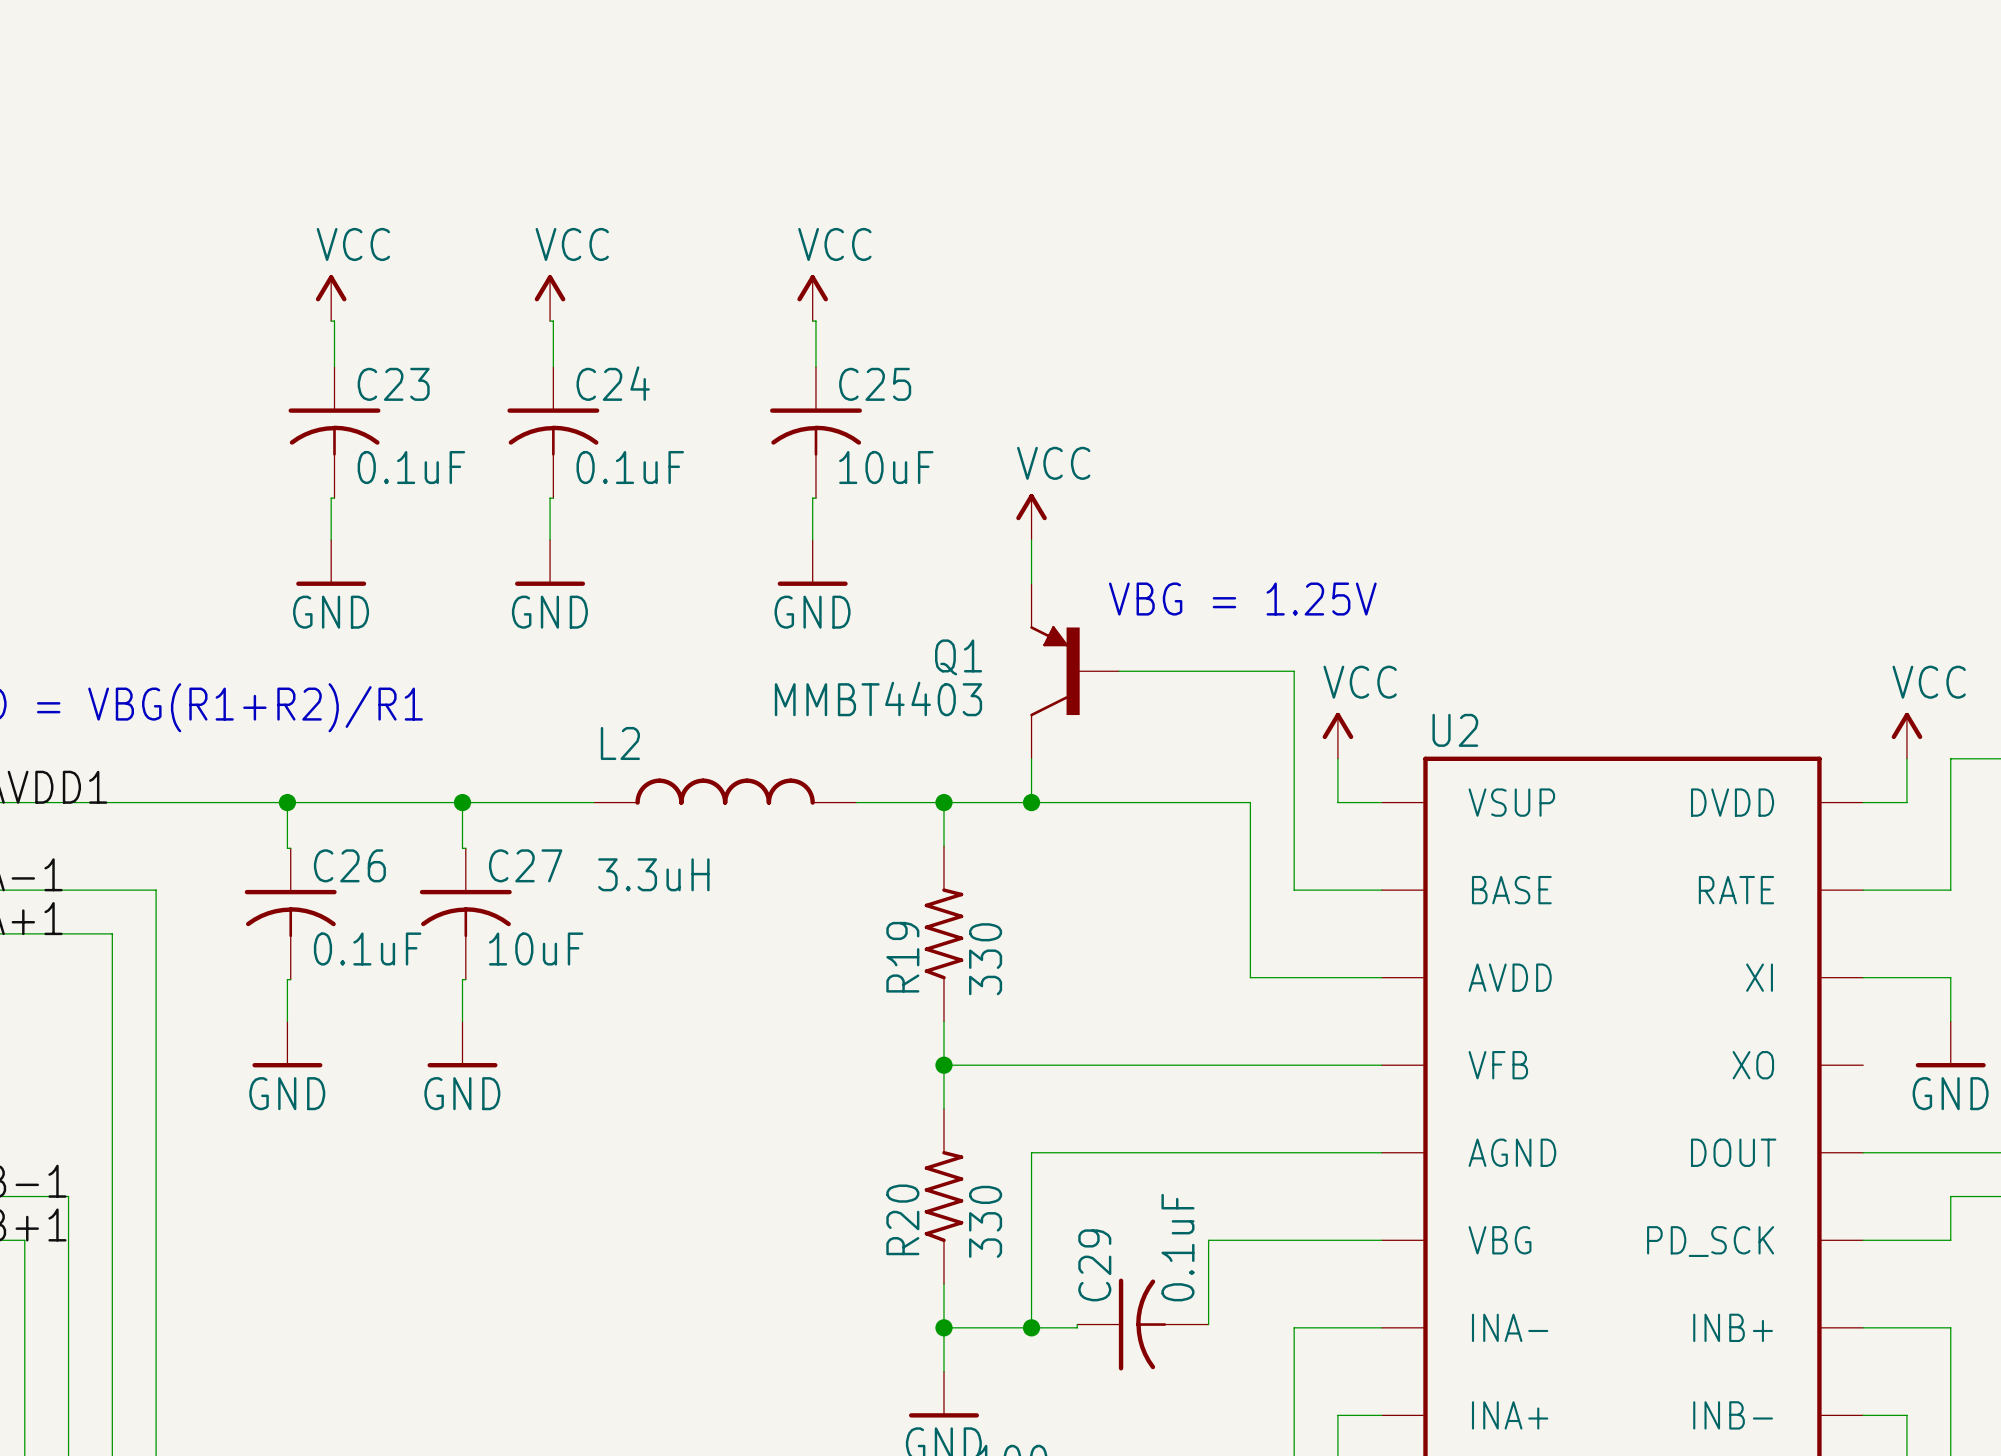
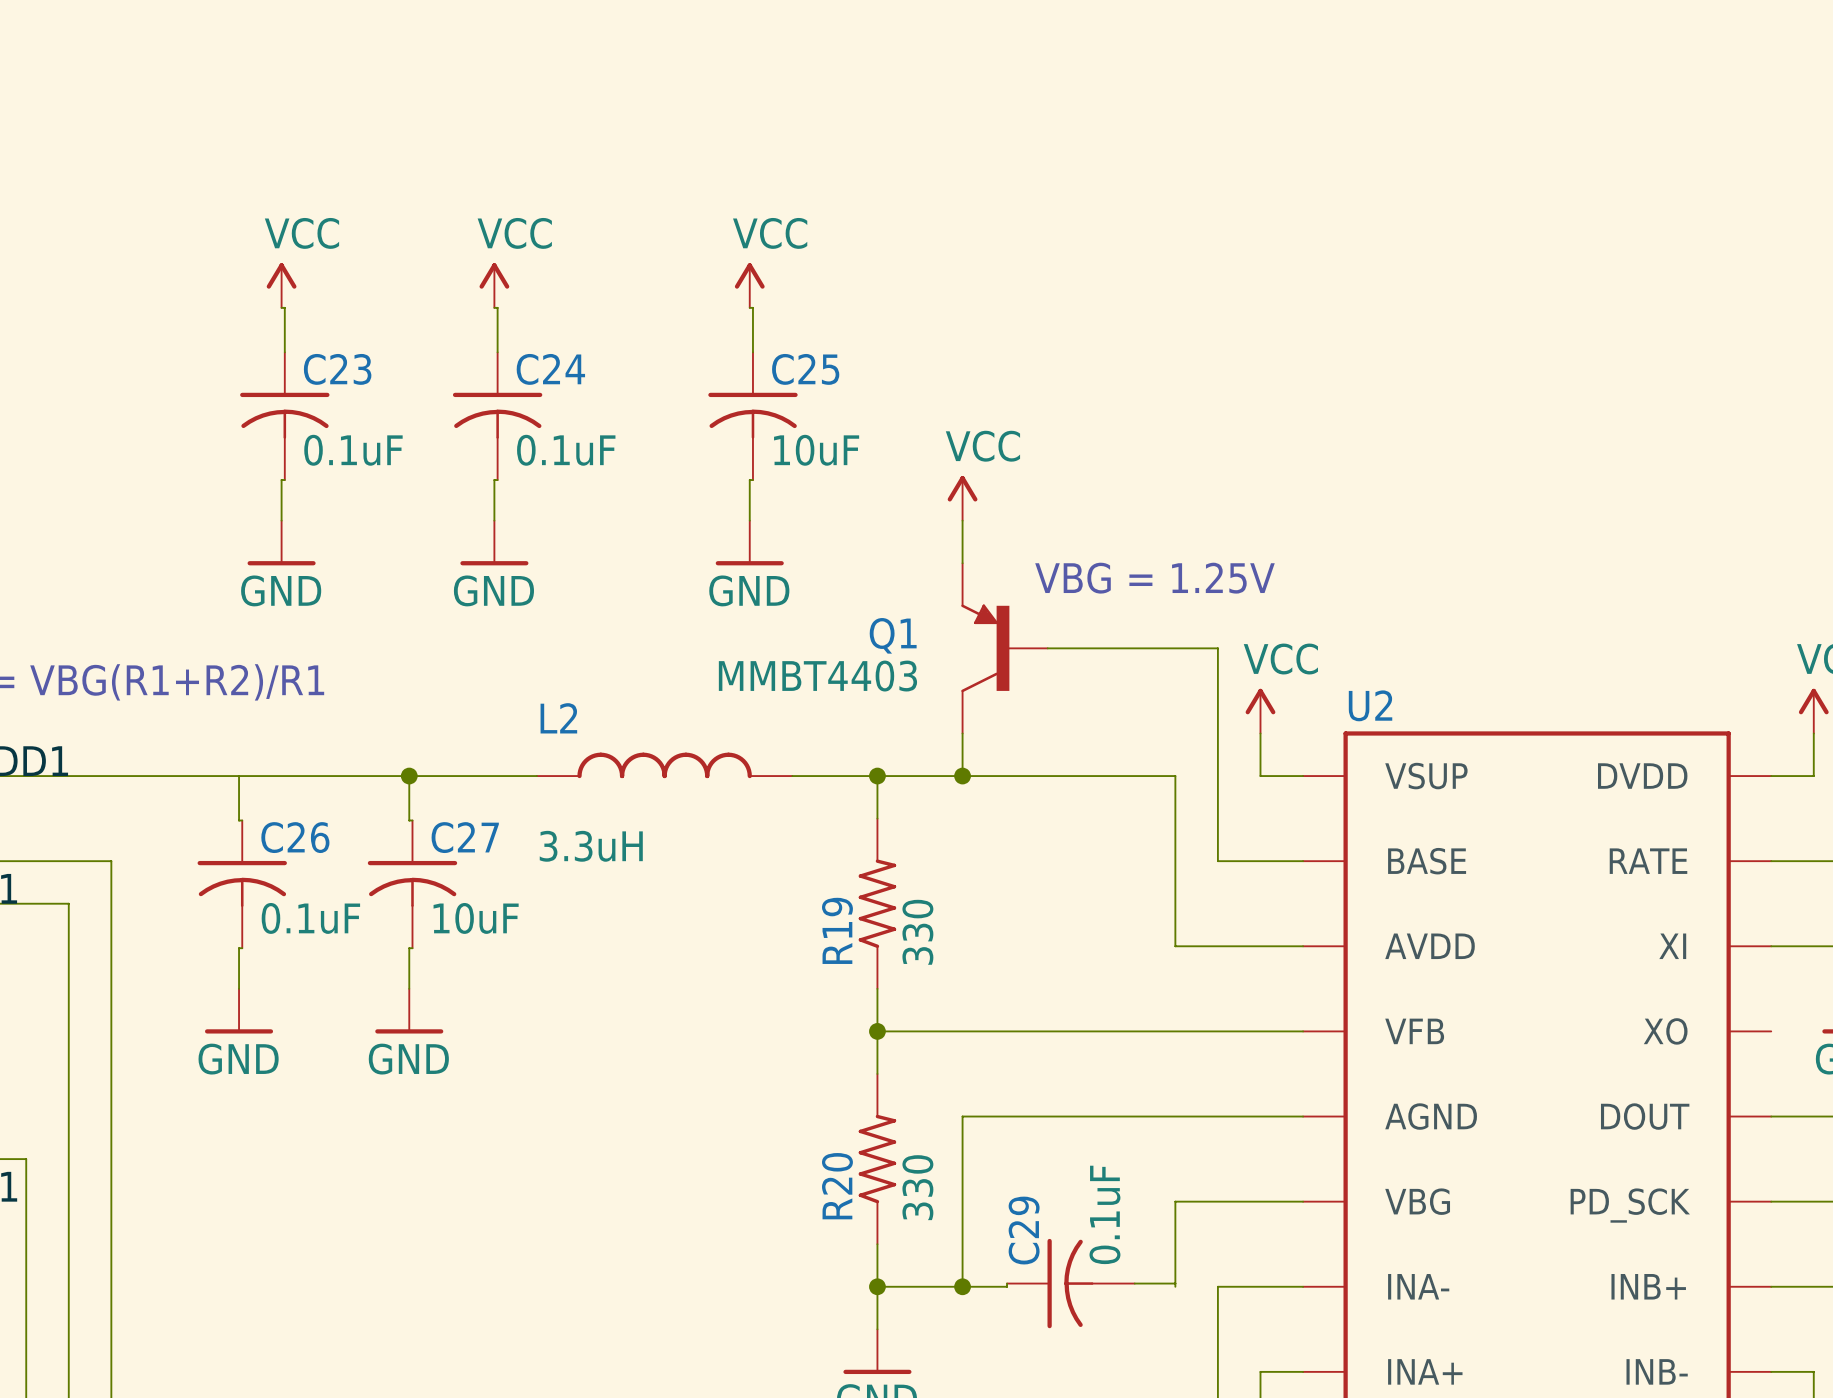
junction: (287, 802) -> none
wire: (1250, 1240) (1208, 1240) (1208, 1324) -> (1175, 1201) (1175, 1286)
wire: none -> (1134, 1283) (1175, 1283)

